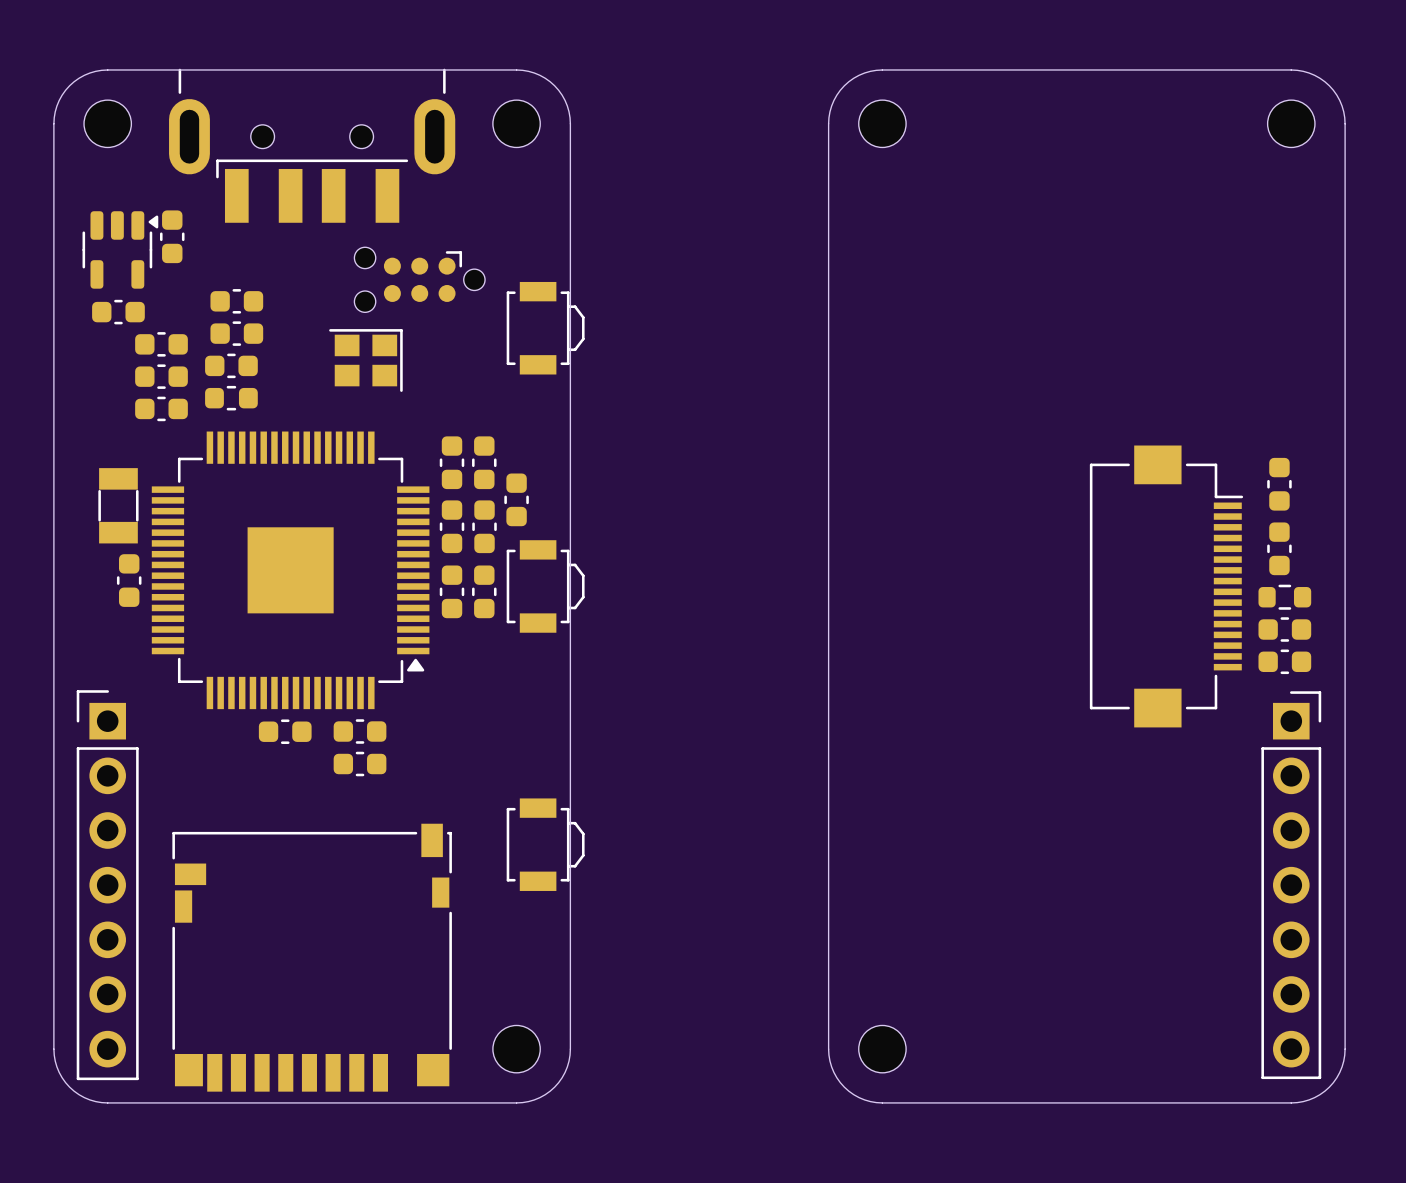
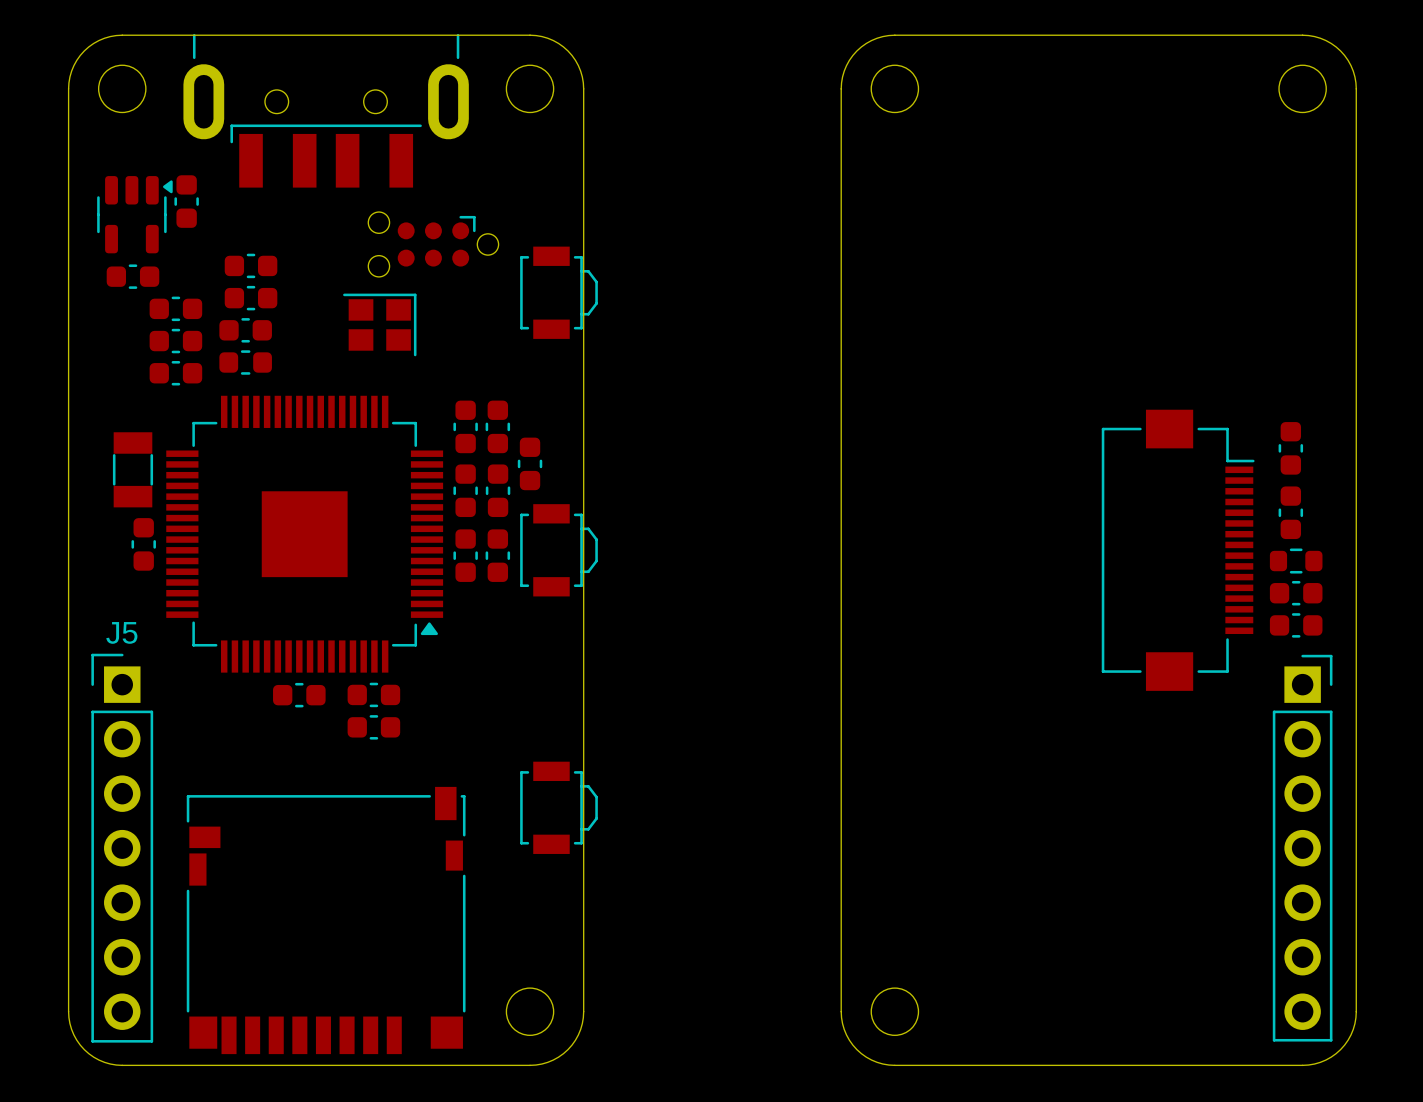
J5 name: none -> J5 (121, 632)

